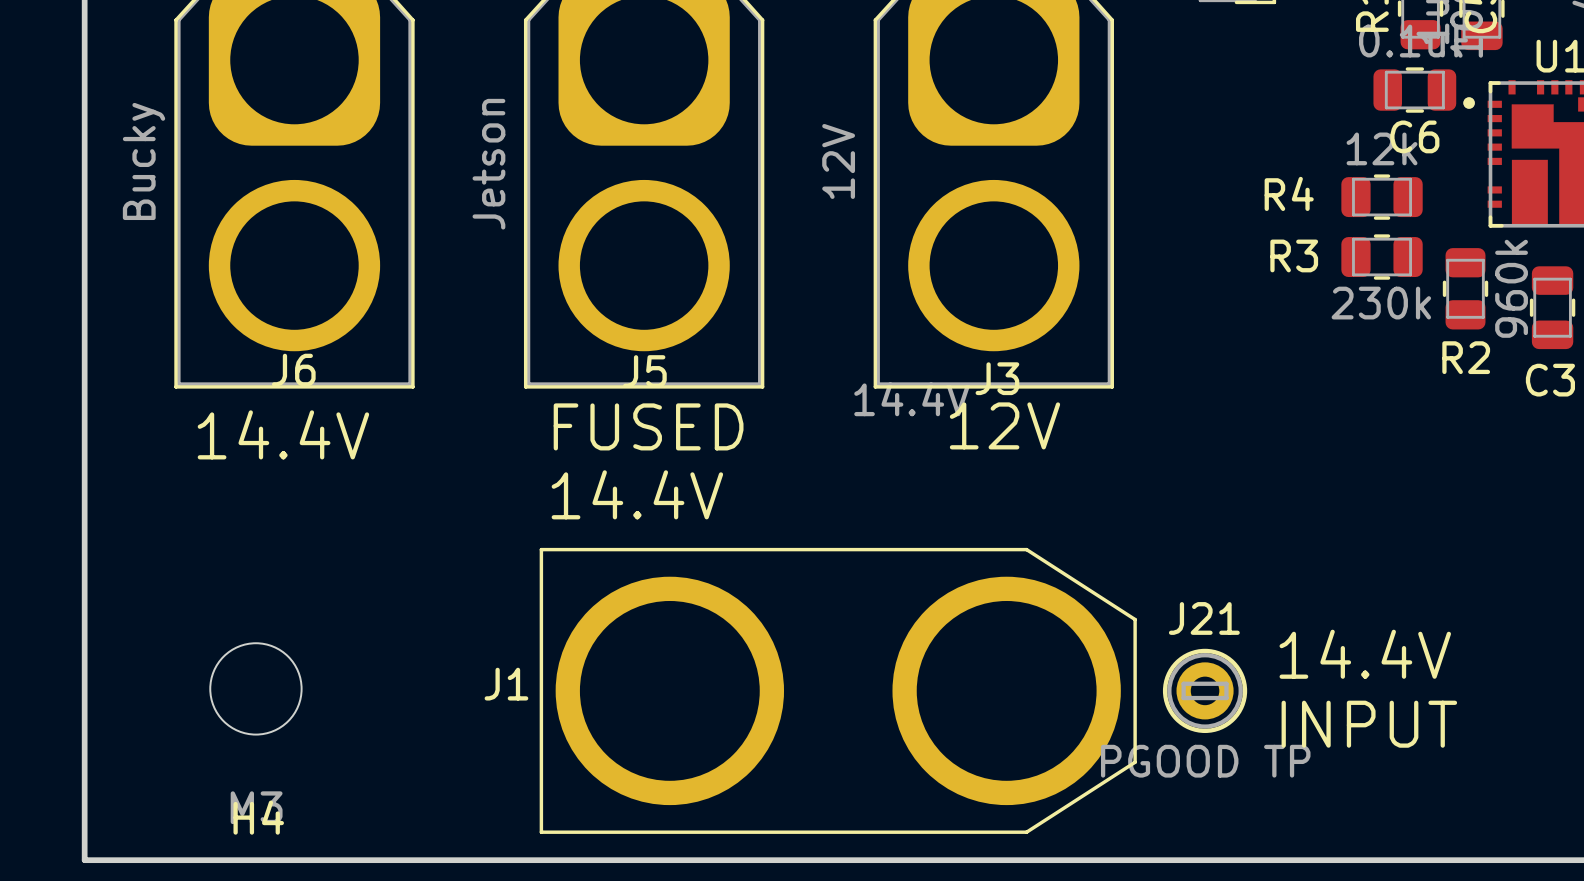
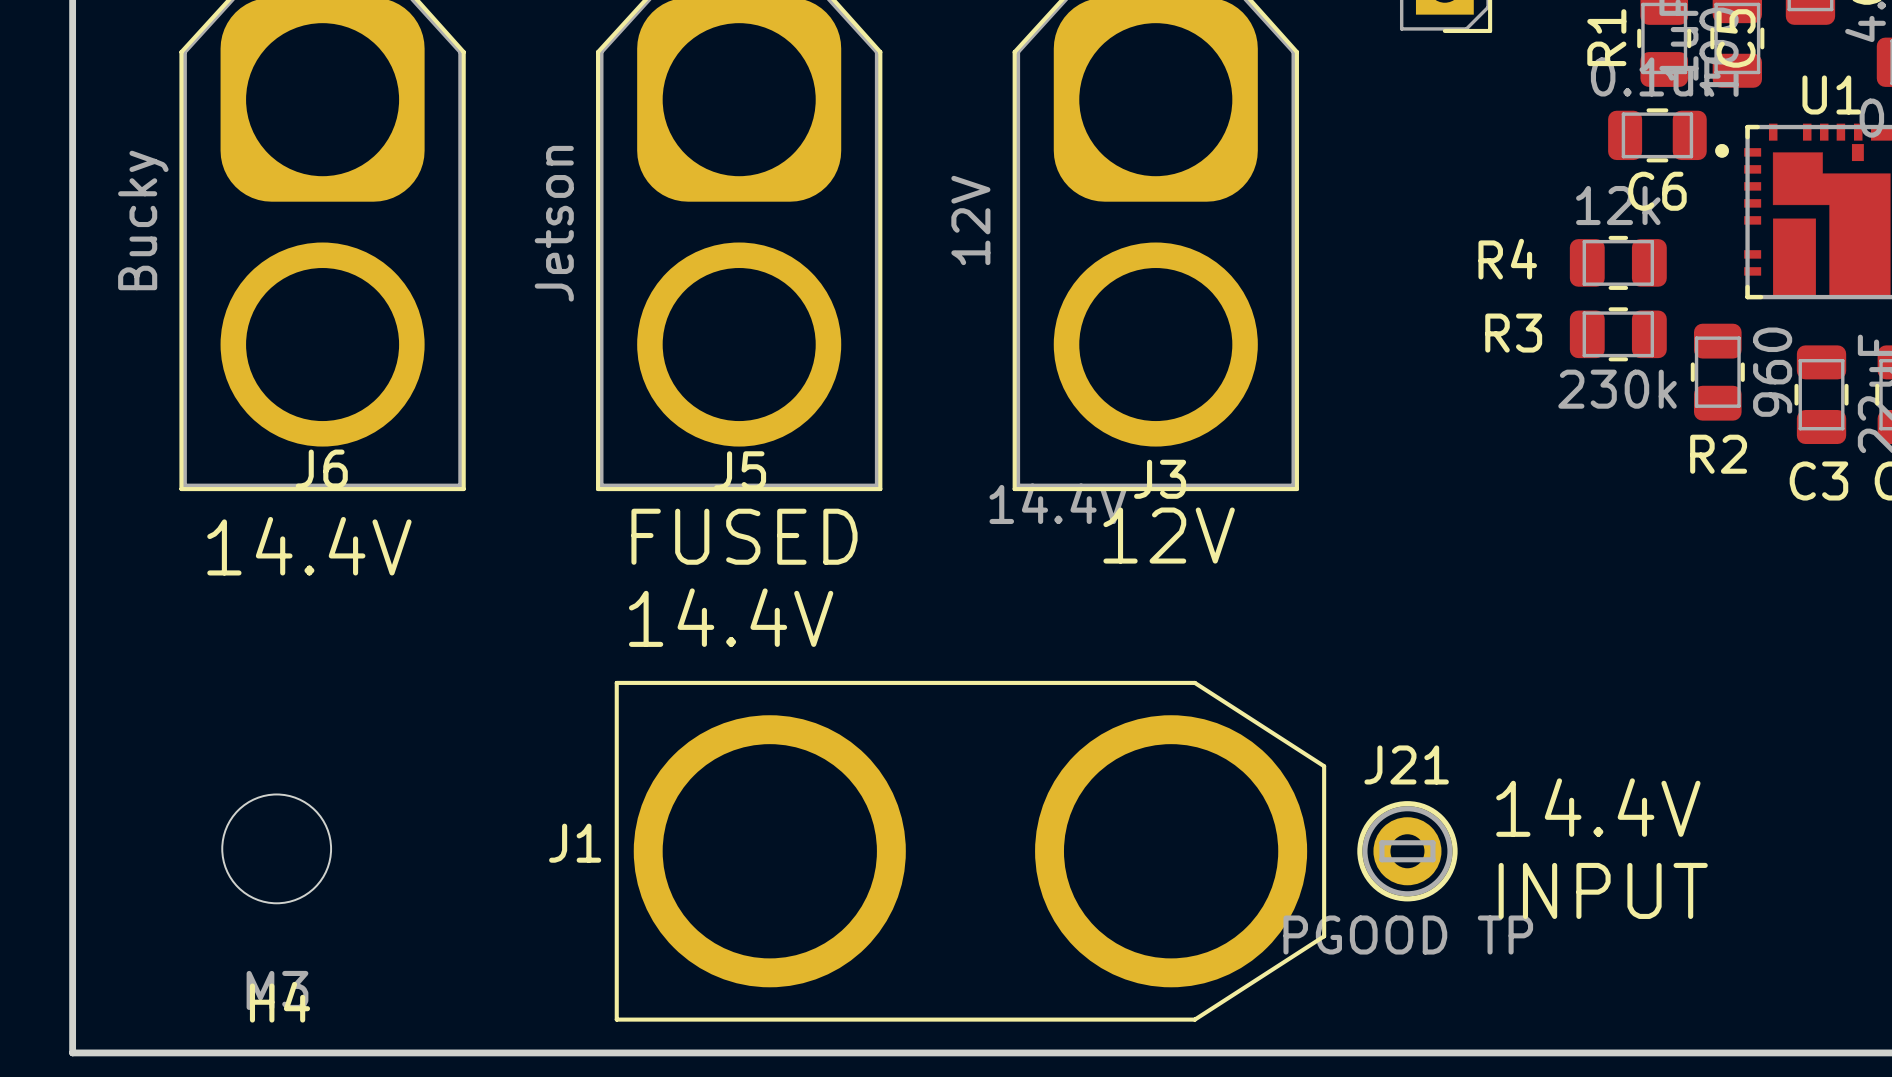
R2 value: 960k (1511, 288) -> 960 (1772, 372)

